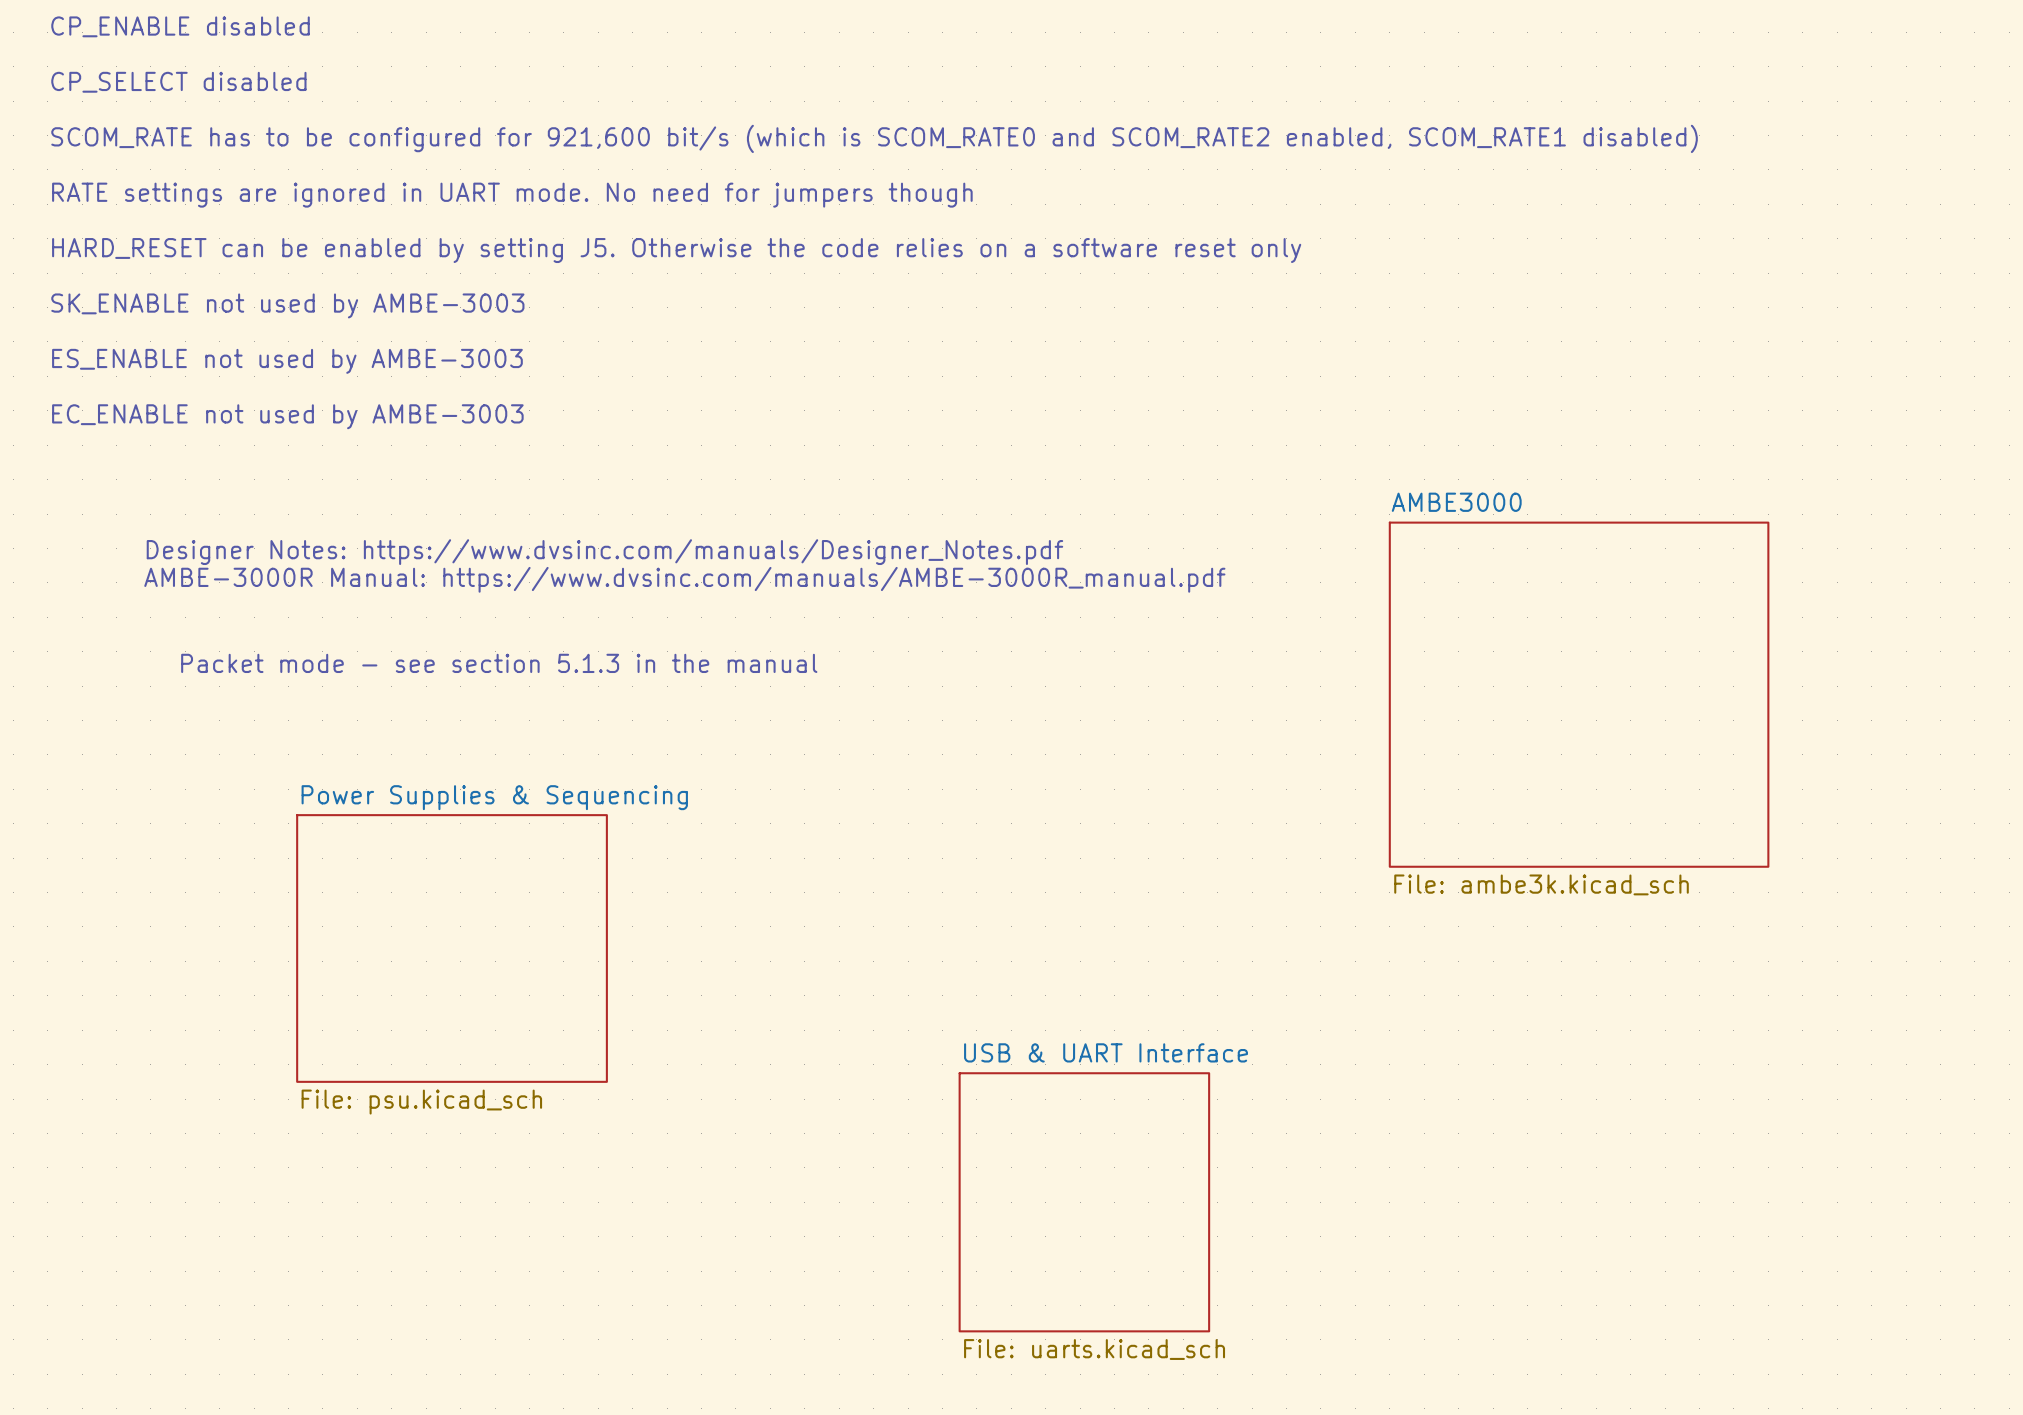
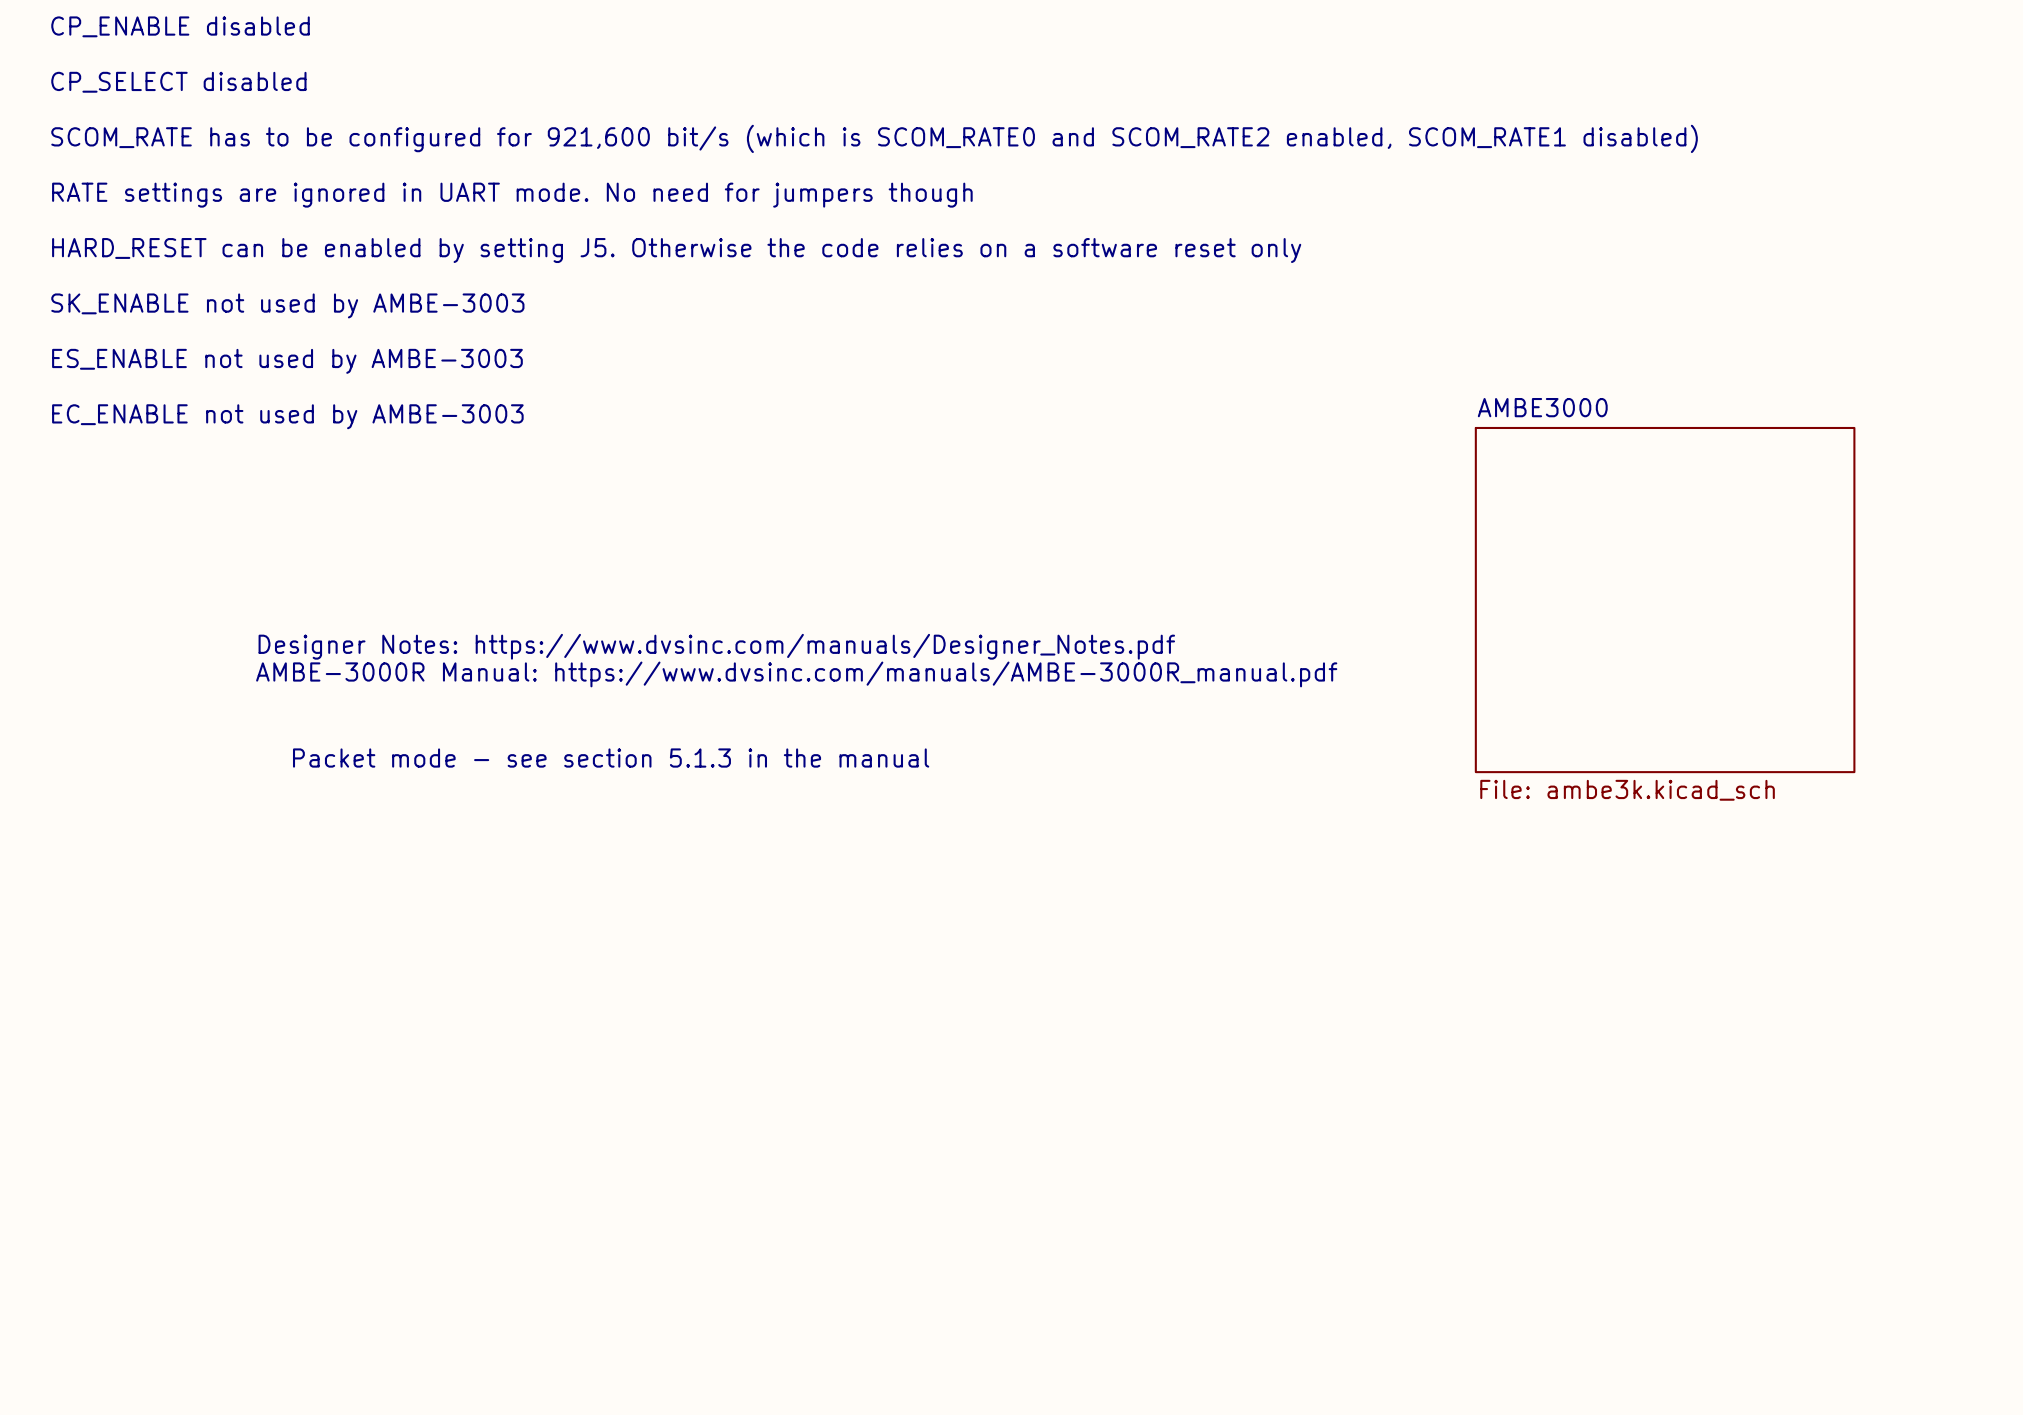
text position: Designer Notes: https://www.dvsinc.com/manuals/Designer_Notes.pdf (604, 552) -> Designer Notes: https://www.dvsinc.com/manuals/Designer_Notes.pdf (716, 646)
text position: AMBE-3000R Manual: https://www.dvsinc.com/manuals/AMBE-3000R_manual.pdf (684, 579) -> AMBE-3000R Manual: https://www.dvsinc.com/manuals/AMBE-3000R_manual.pdf (796, 674)
text position: Packet mode - see section 5.1.3 in the manual (499, 663) -> Packet mode - see section 5.1.3 in the manual (611, 758)
sheet AMBE3000 position: (1579, 694) -> (1665, 600)
sheet Power Supplies & Sequencing: File: psu.kicad_sch (452, 948) -> none
sheet USB & UART Interface: File: uarts.kicad_sch (1084, 1202) -> none

